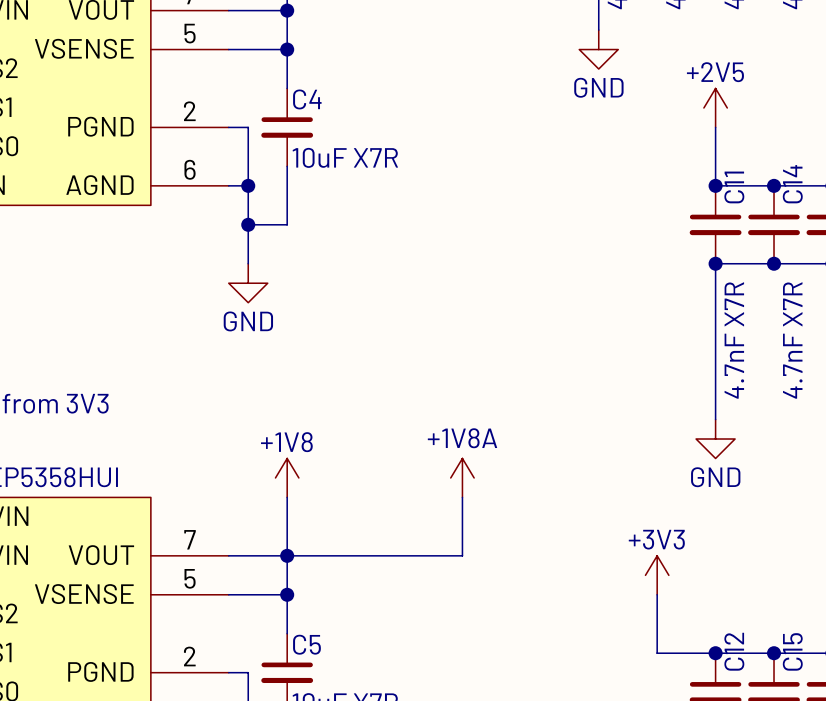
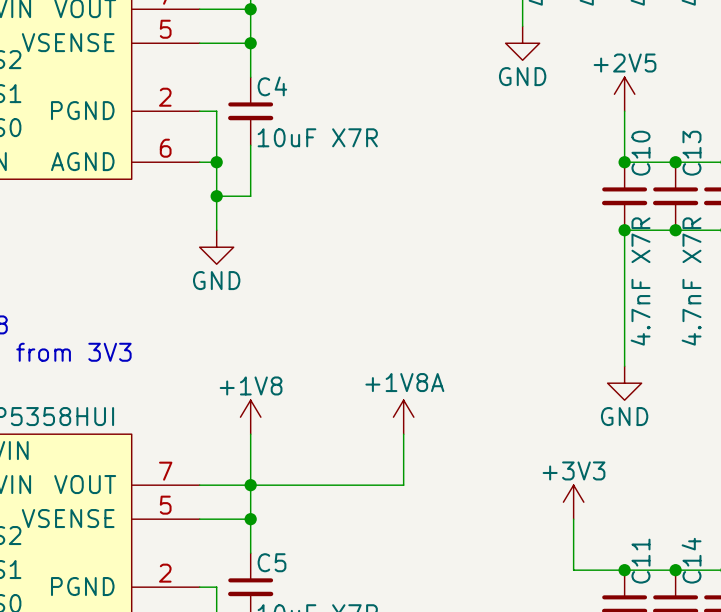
C14 name: C14 (792, 184) -> C13 (691, 153)
C11 name: C11 (734, 187) -> C10 (640, 153)
C12 name: C12 (734, 651) -> C11 (640, 561)
C15 name: C15 (792, 651) -> C14 (691, 560)

